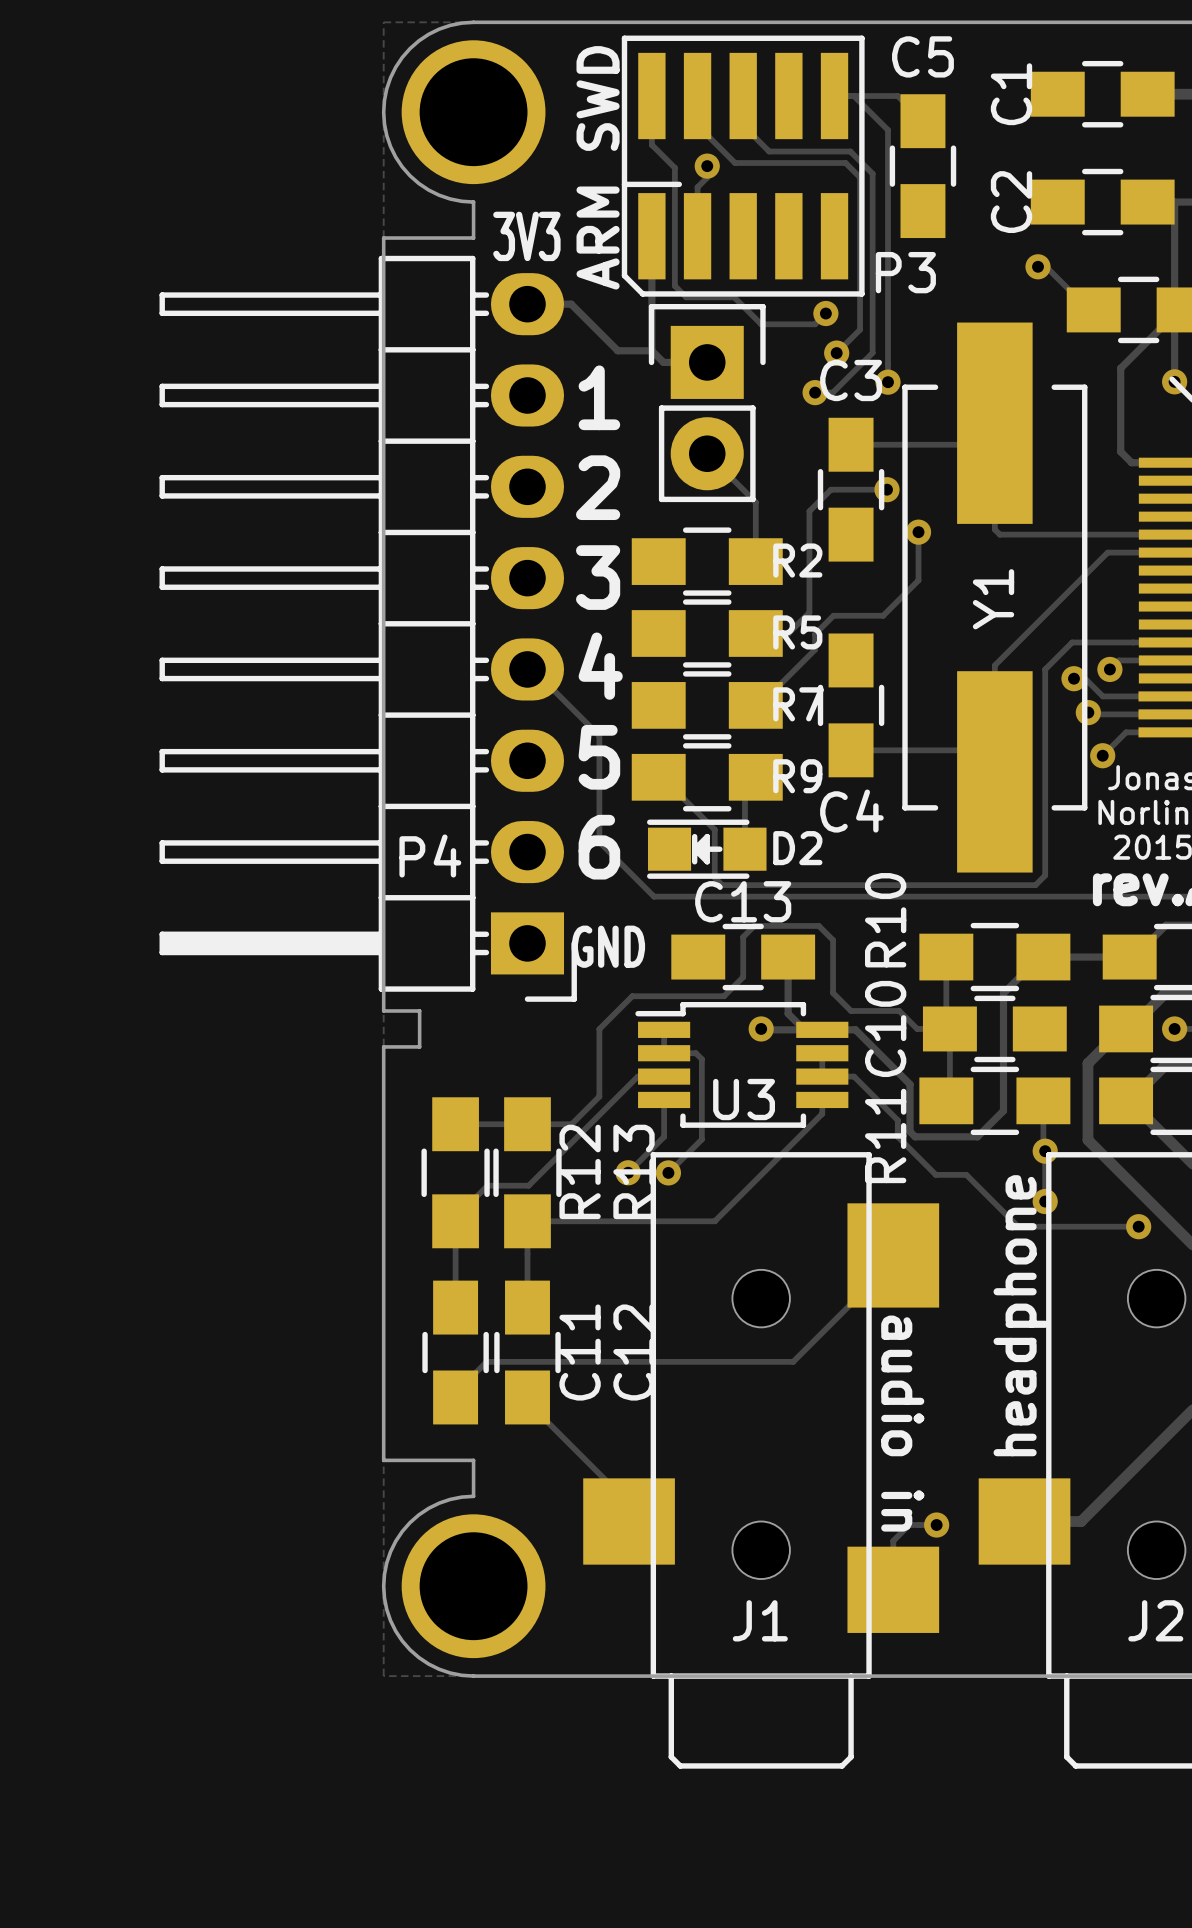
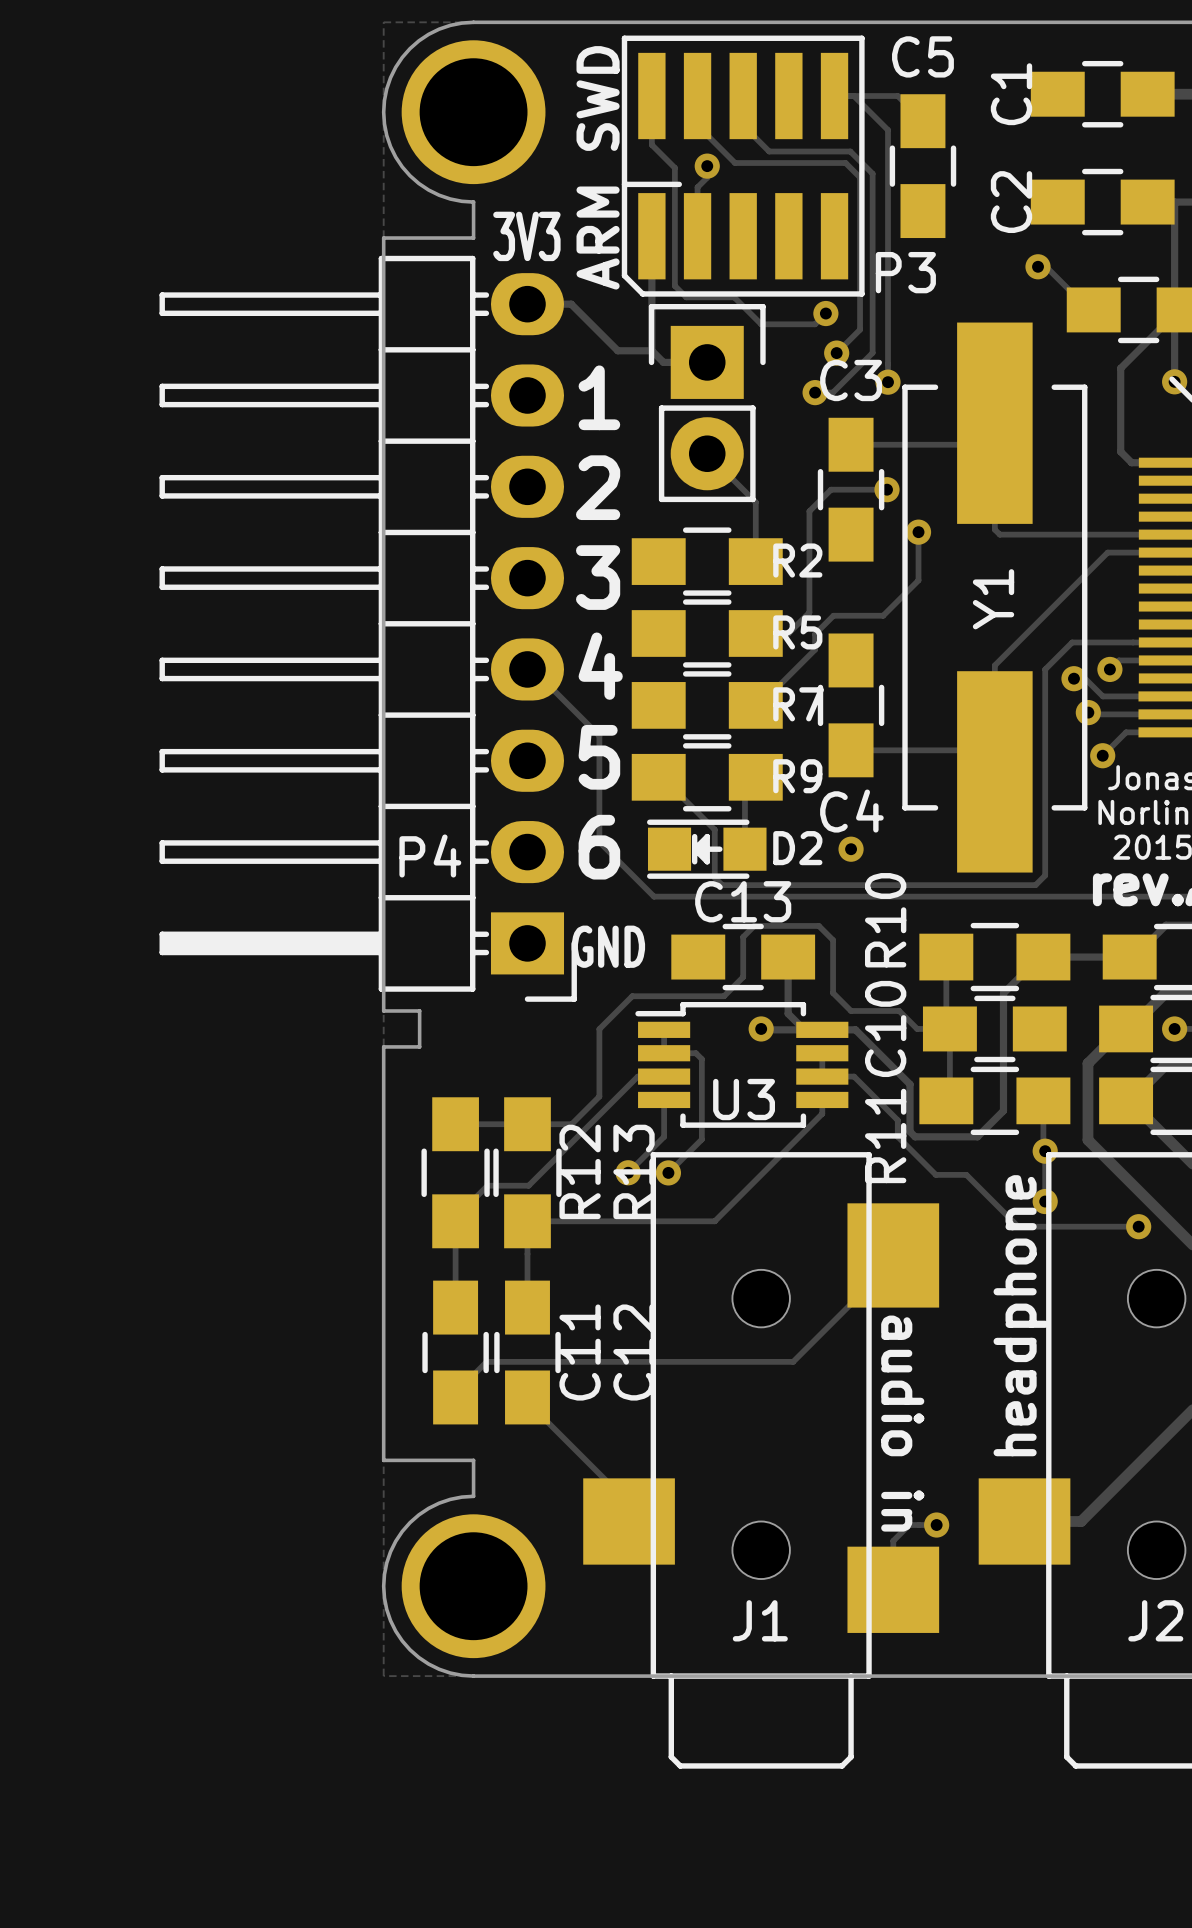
via: none -> (851, 849)

